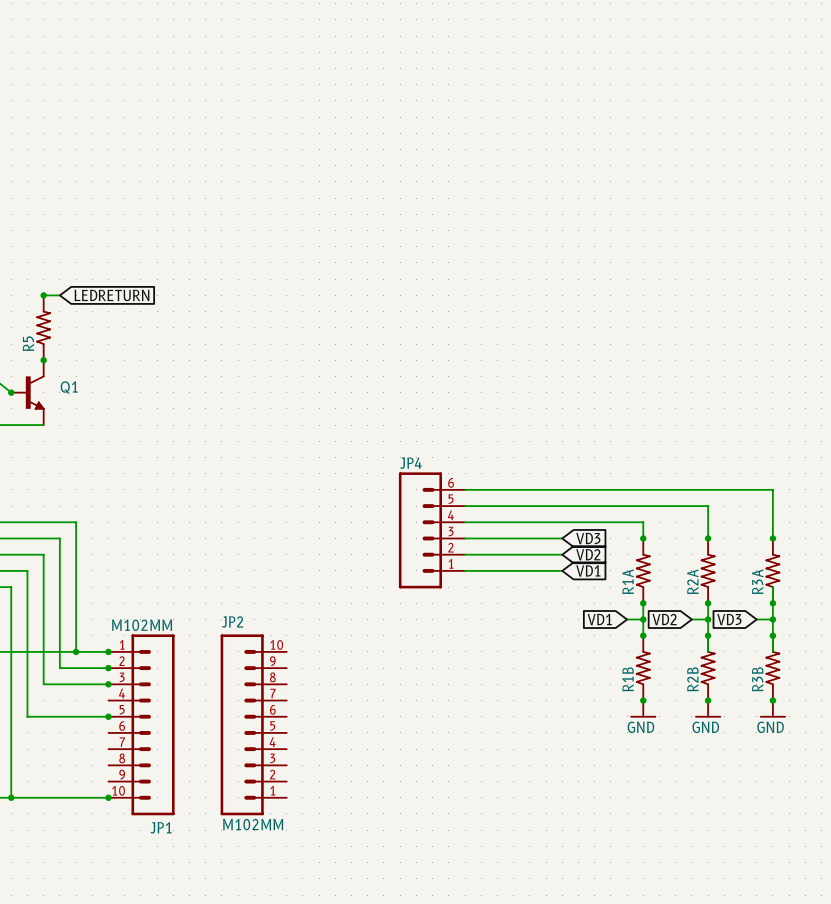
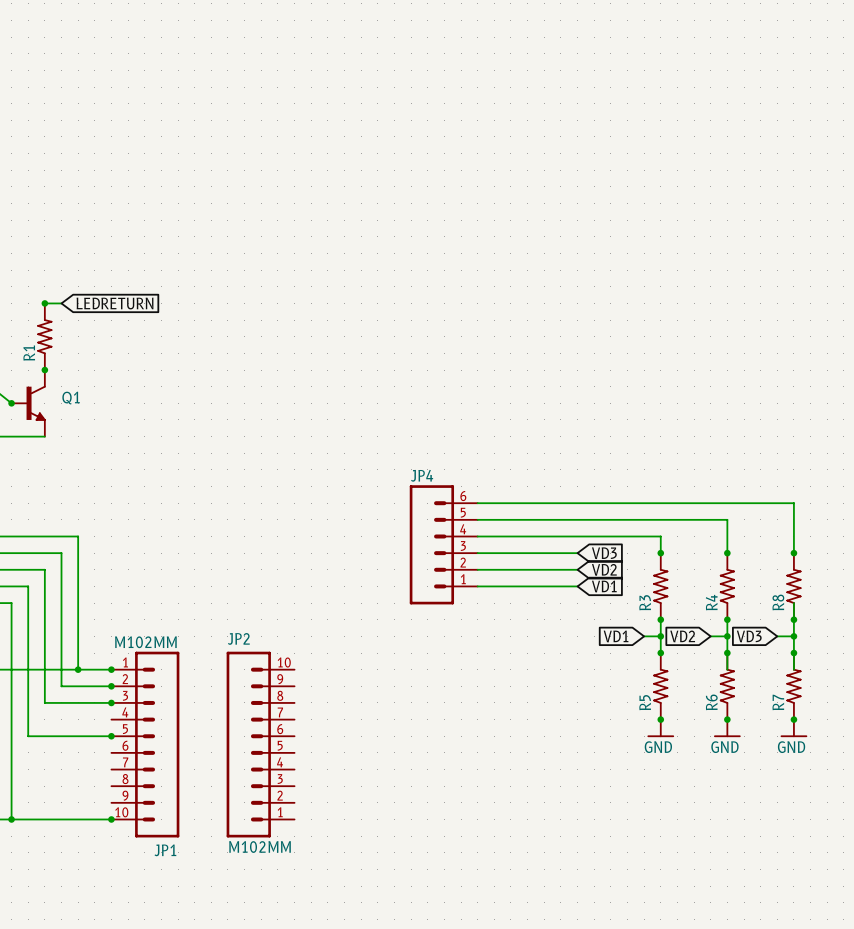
R5 name: R5 (28, 343) -> R1 (29, 353)
R1A name: R1A (628, 581) -> R3 (645, 602)
R2A name: R2A (692, 581) -> R4 (711, 602)
R3A name: R3A (757, 581) -> R8 (778, 602)
R1B name: R1B (628, 679) -> R5 (645, 702)
R2B name: R2B (692, 679) -> R6 (711, 702)
R3B name: R3B (757, 679) -> R7 (778, 702)

